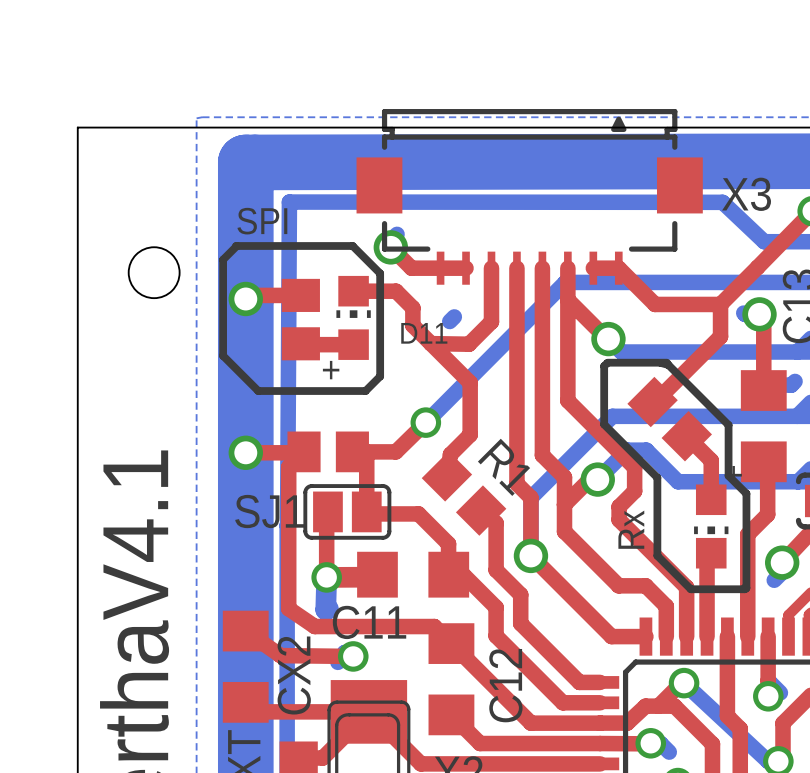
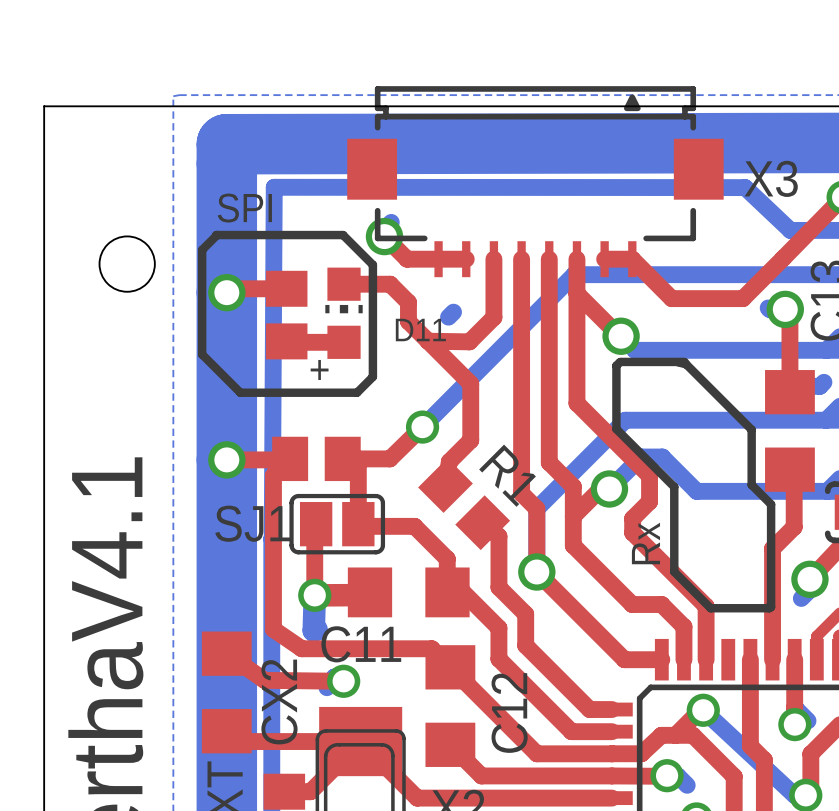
top track: (720, 304) (720, 336) (655, 402) (652, 402) -> none
part: (669, 419) -> none
top track: (686, 436) (711, 460) (711, 499) -> none
part: (711, 526) -> none
top track: (711, 553) (707, 557) (707, 636) -> none

